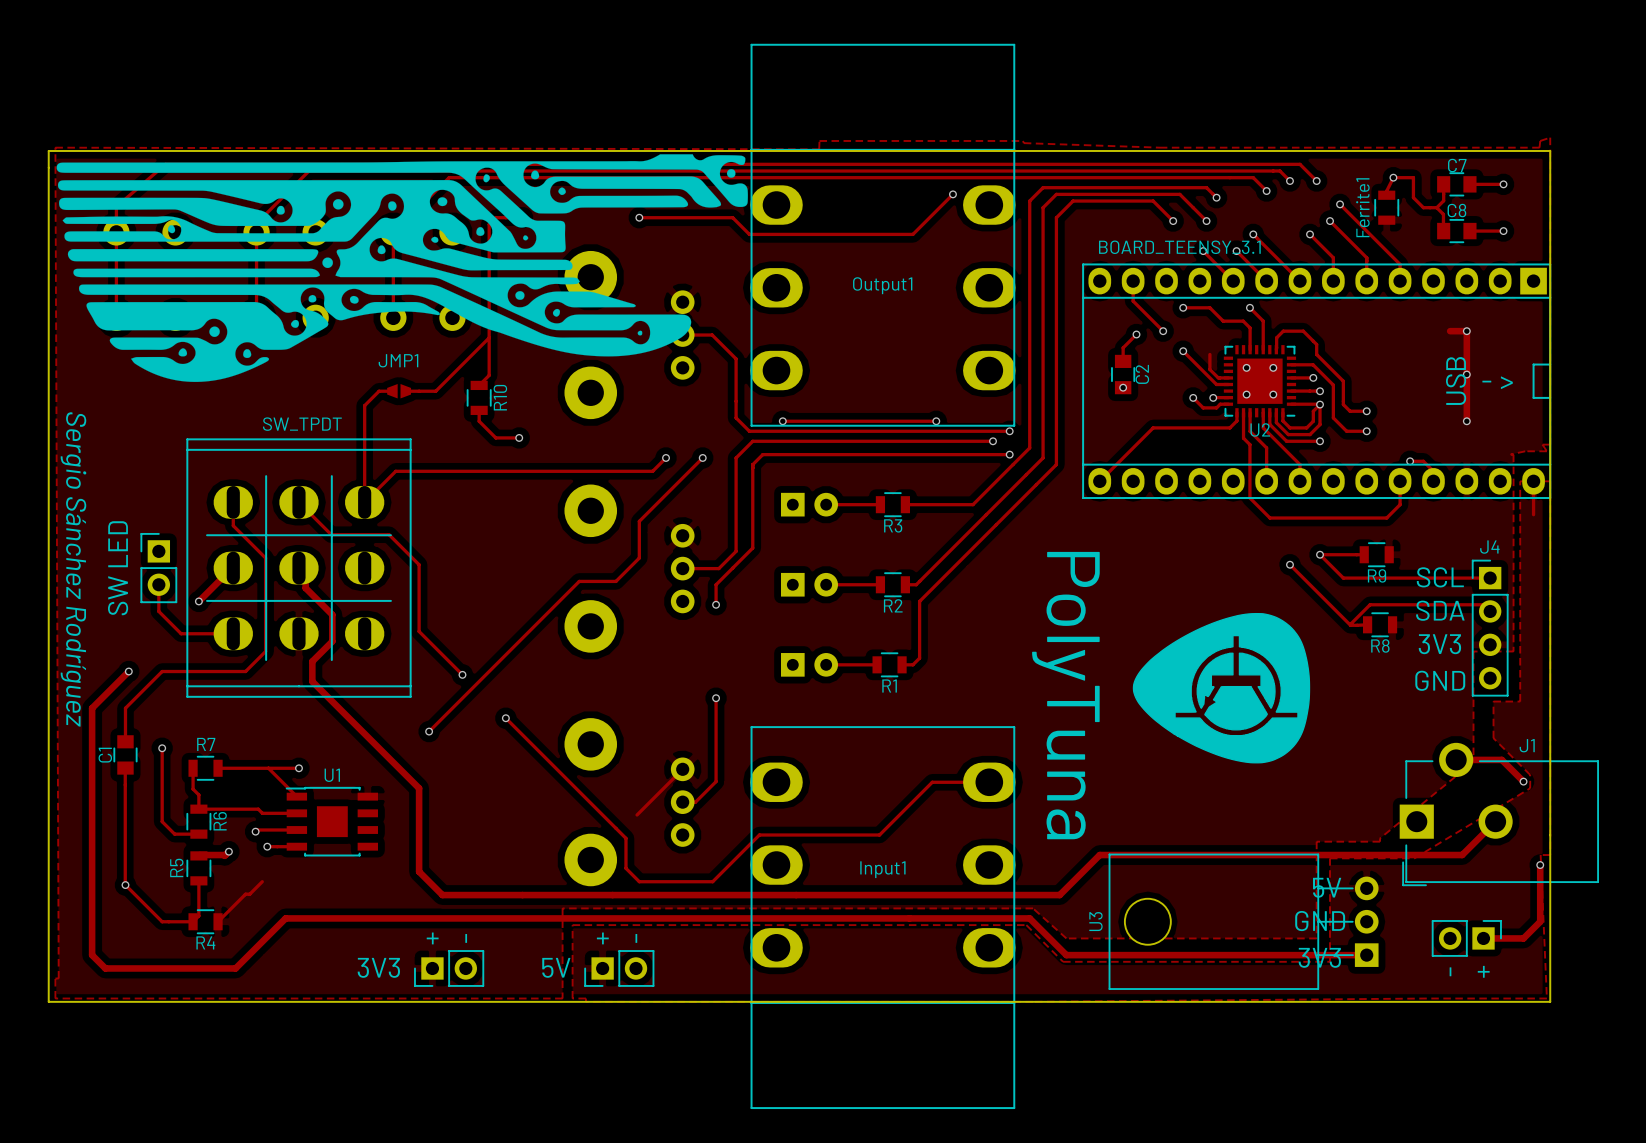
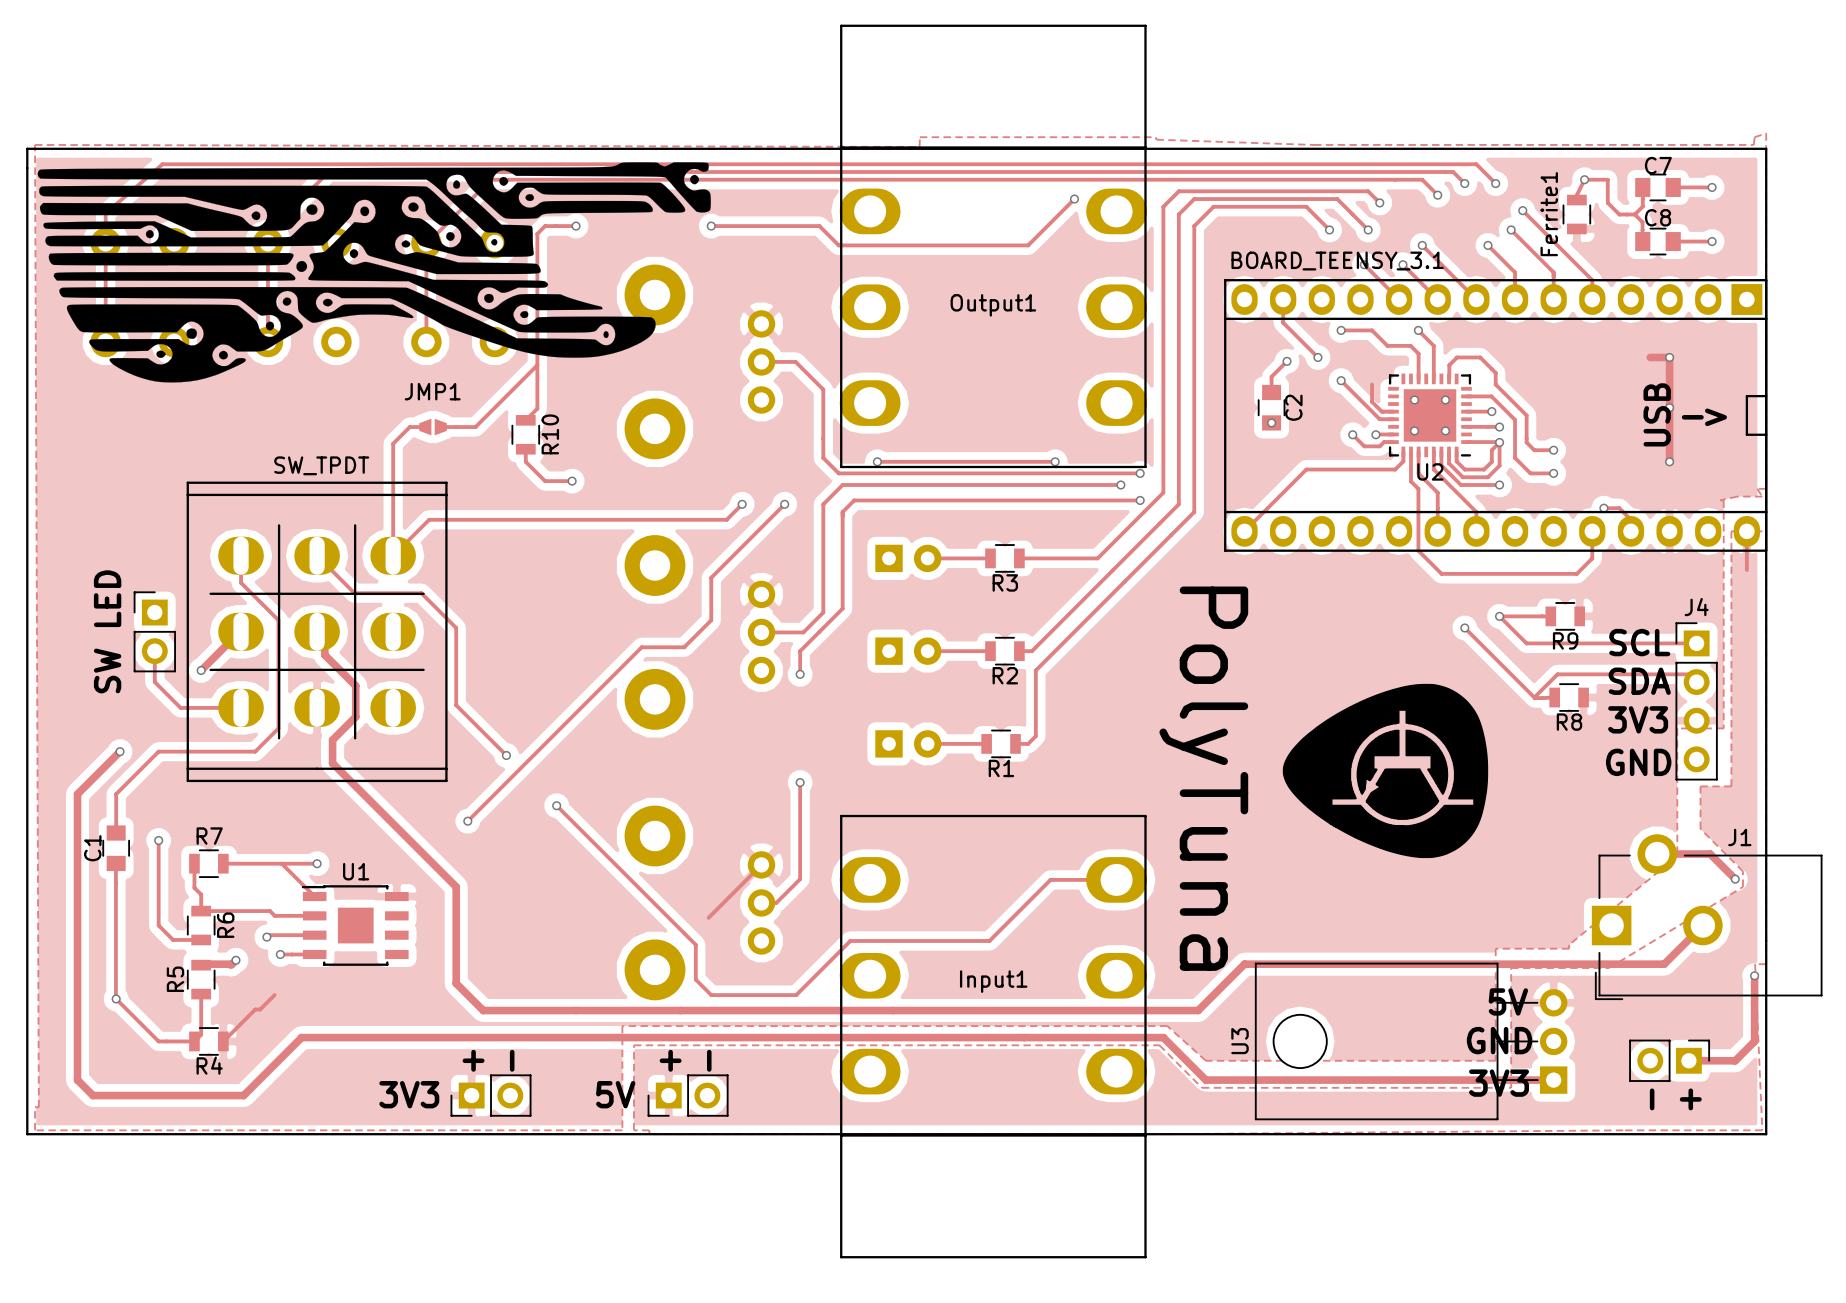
drawing: [56, 154, 748, 382] -> none
drawing: none -> [37, 162, 711, 383]
text: Sergio Sánchez Rodríguez (73, 569) -> none

